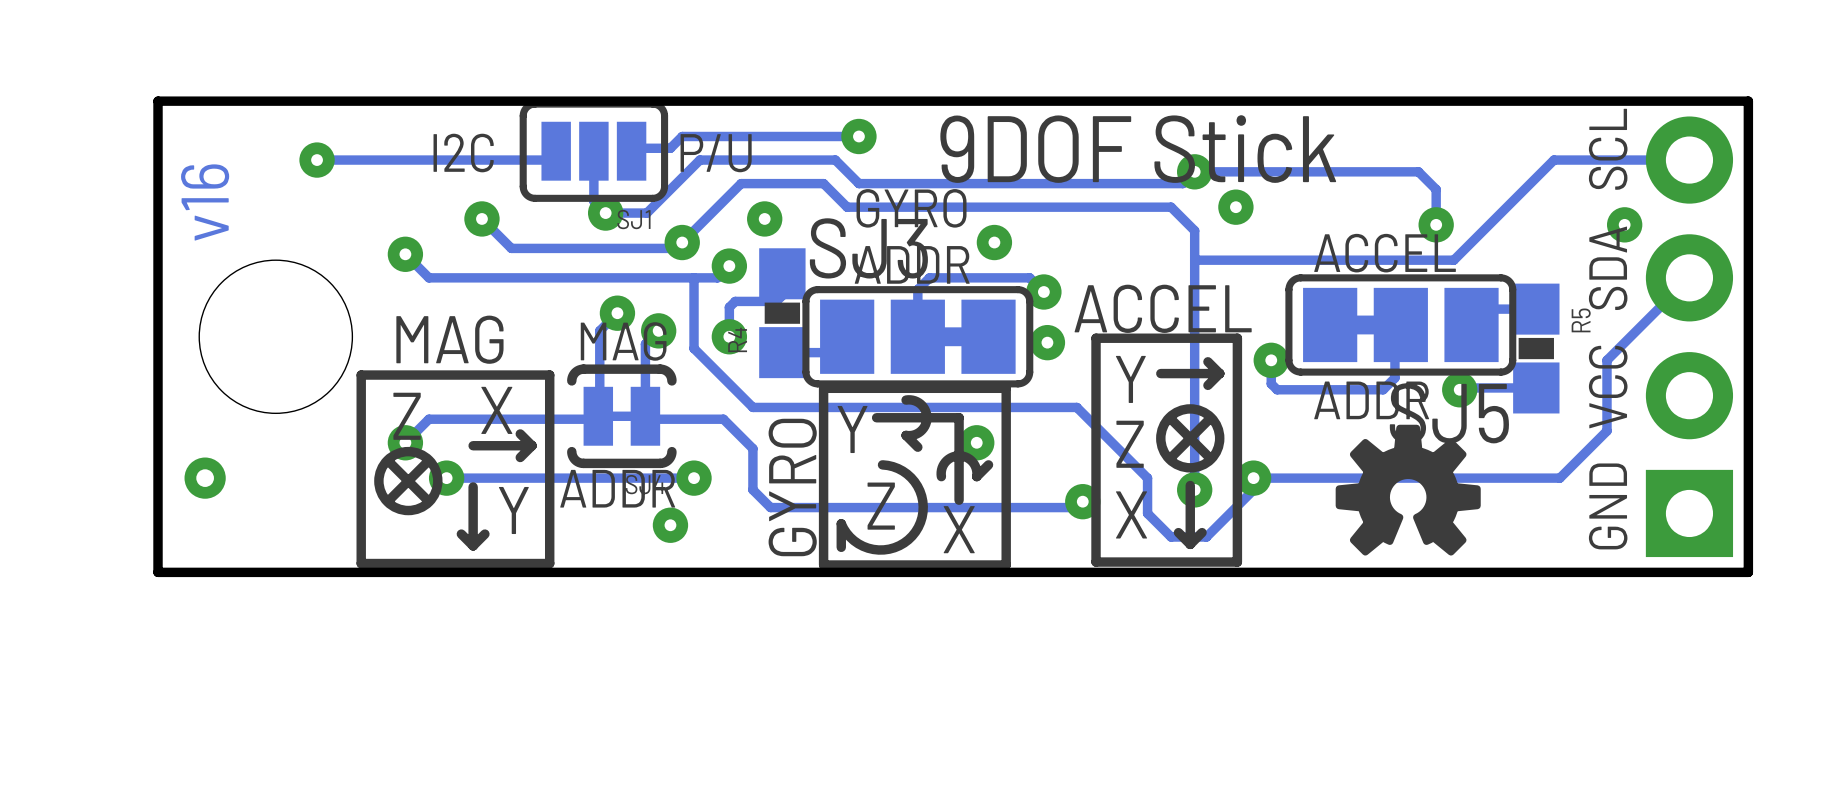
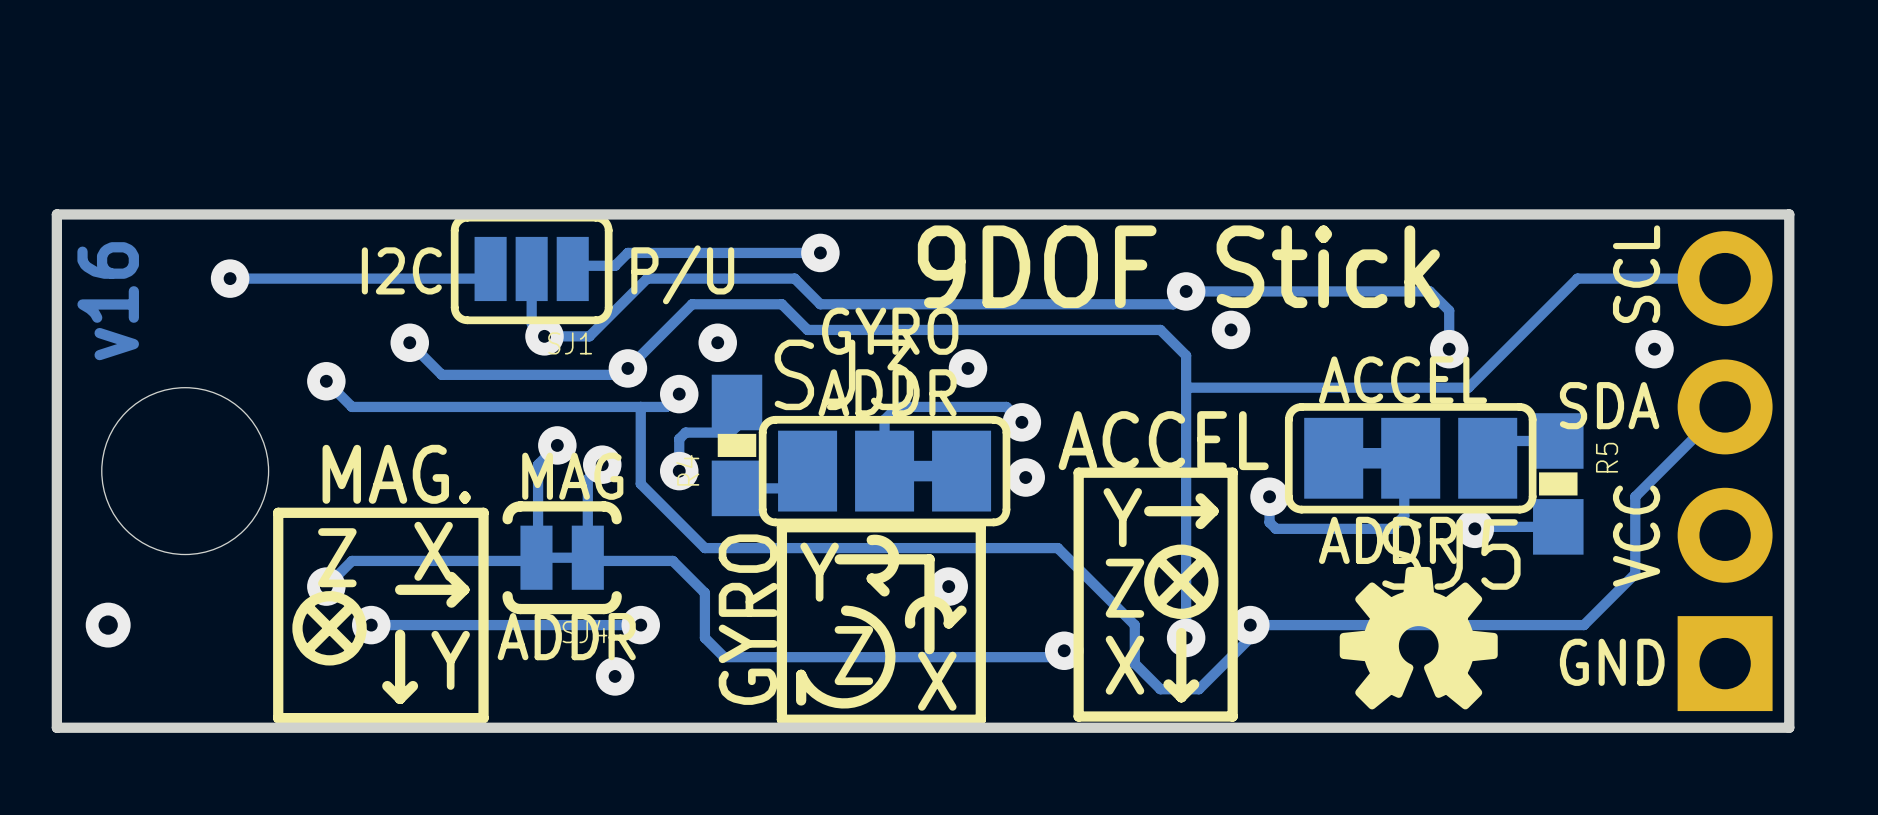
text rotation: 0° (1608, 268) -> 90° clockwise (1609, 405)
text: MAG (449, 339) -> MAG. (396, 474)
text rotation: 0° (1608, 506) -> 90° clockwise (1612, 662)

